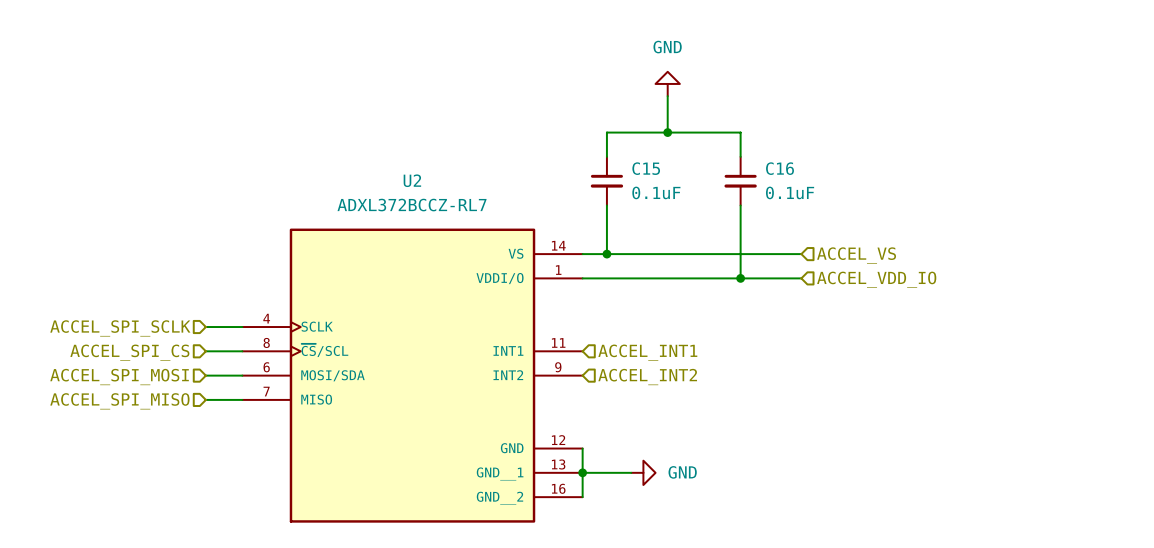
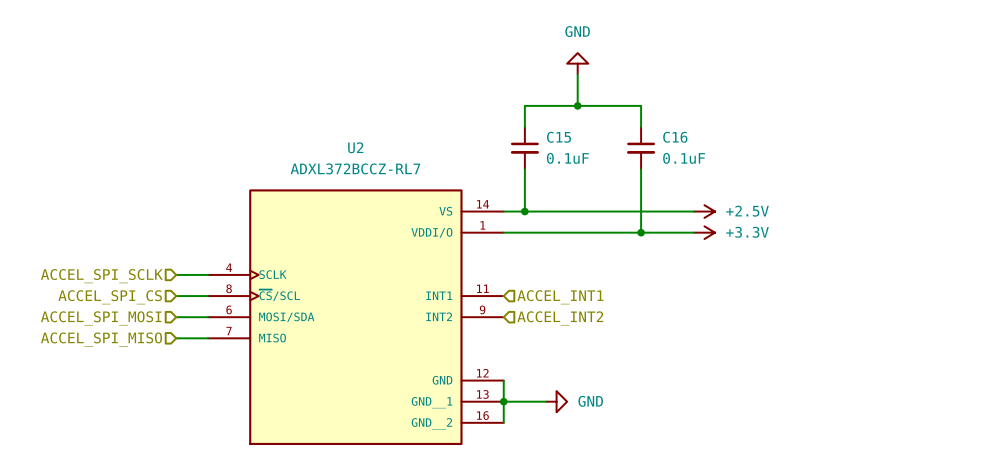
power symbol: none -> +2.5V (704, 211)
hierarchical label: ACCEL_VS (856, 255) -> none
power symbol: none -> +3.3V (704, 232)
hierarchical label: ACCEL_VDD_IO (876, 279) -> none

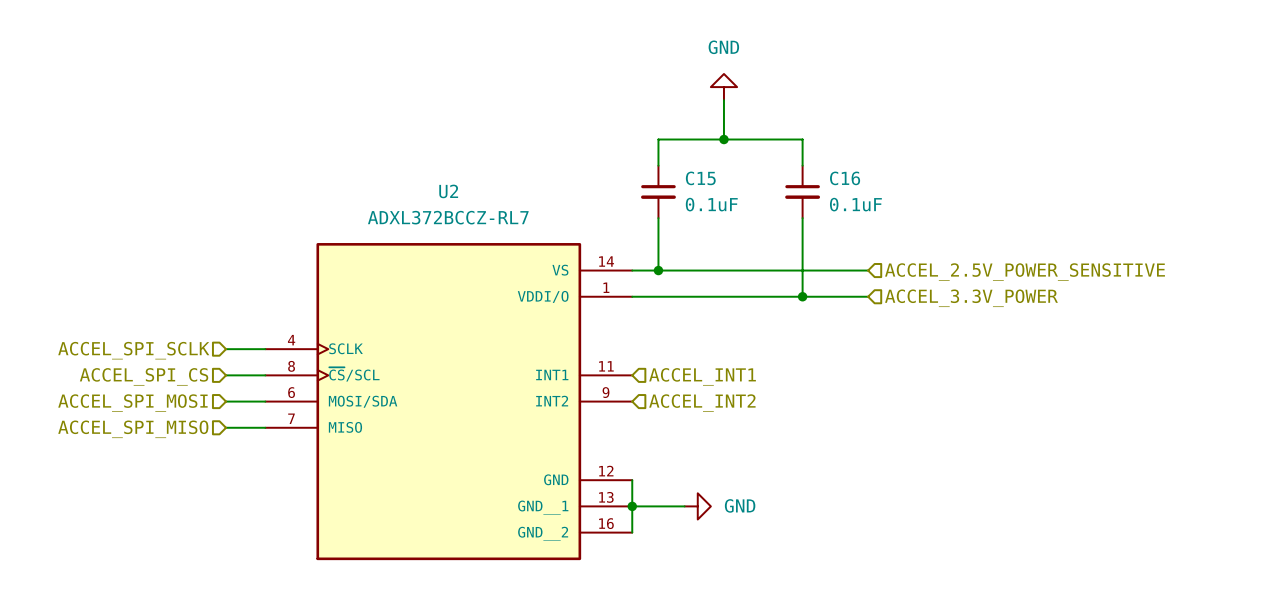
power symbol: +2.5V (704, 211) -> none
hierarchical label: none -> ACCEL_2.5V_POWER_SENSITIVE (1025, 272)
power symbol: +3.3V (704, 232) -> none
hierarchical label: none -> ACCEL_3.3V_POWER (971, 298)

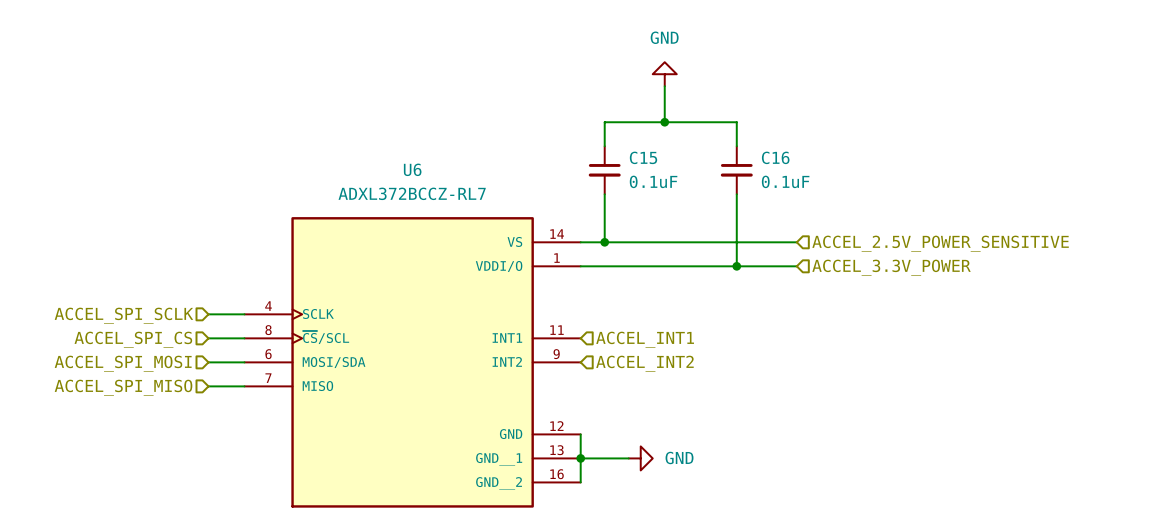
U2 name: U2 (448, 191) -> U6 (412, 169)

